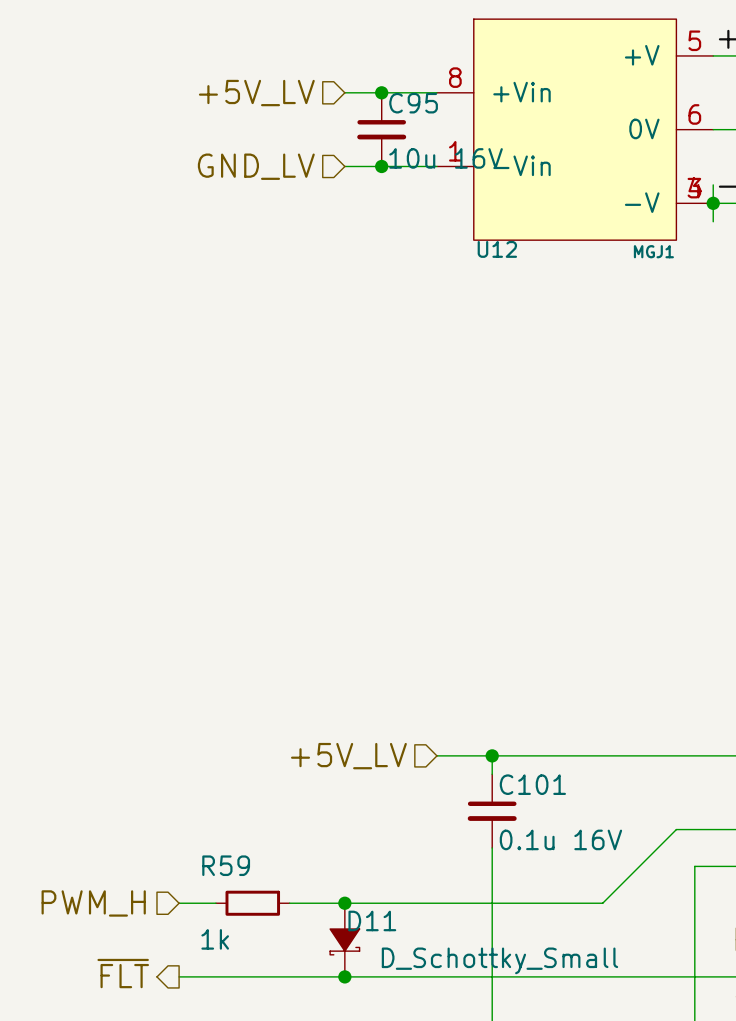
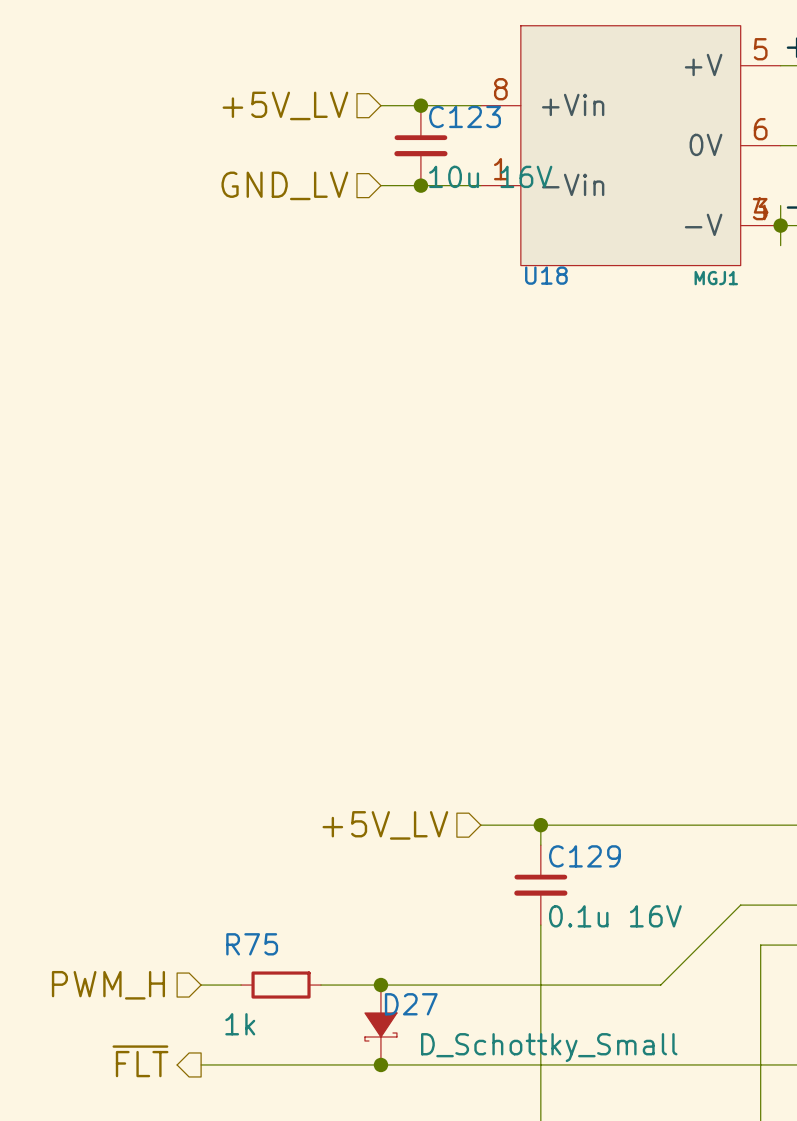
C95 name: C95 (413, 103) -> C123 (465, 116)
U12 name: U12 (497, 249) -> U18 (546, 275)
C101 name: C101 (532, 784) -> C129 (584, 856)
R59 name: R59 (226, 865) -> R75 (252, 944)
D11 name: D11 (372, 920) -> D27 (411, 1004)

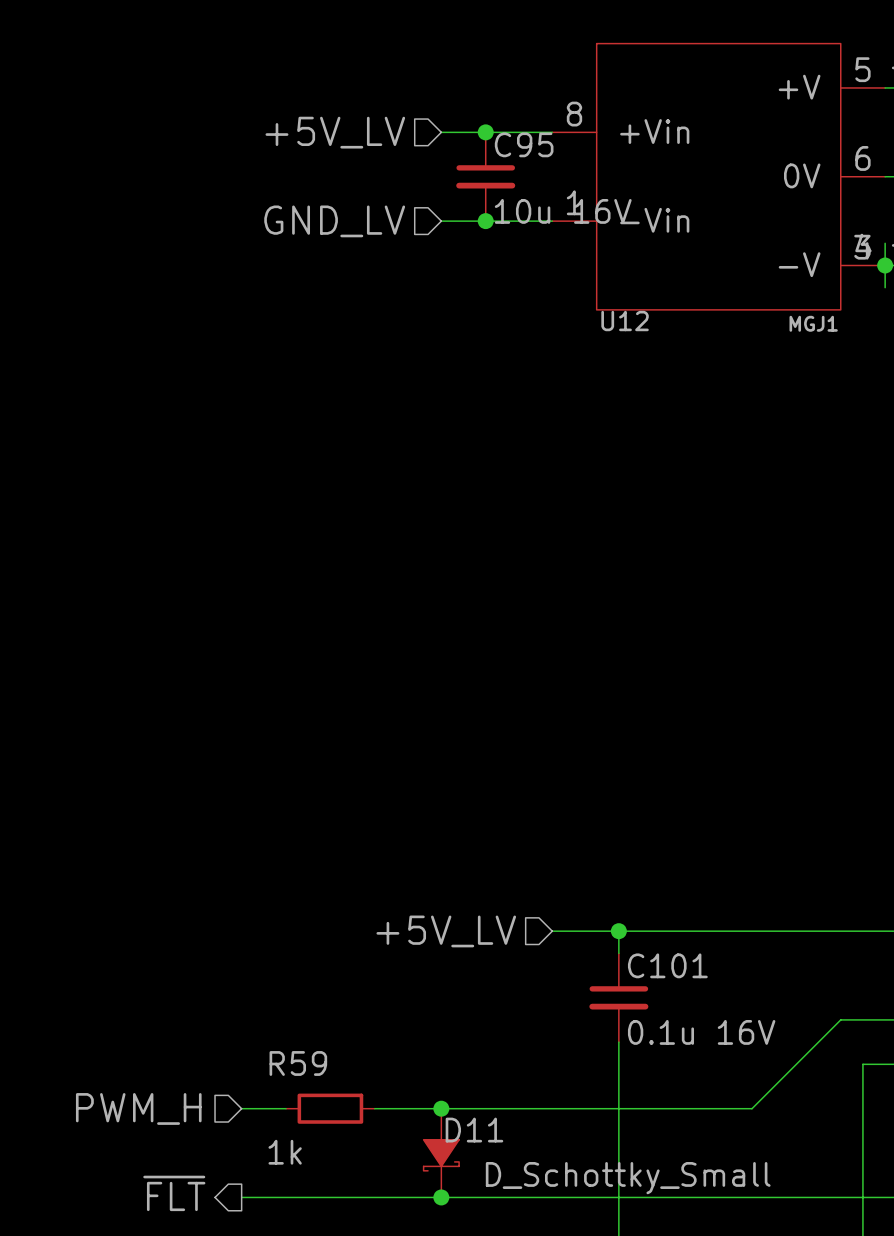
C123 name: C123 (465, 116) -> C95 (524, 144)
U18 name: U18 (546, 275) -> U12 (625, 321)
C129 name: C129 (584, 856) -> C101 (667, 965)
R75 name: R75 (252, 944) -> R59 (298, 1063)
D27 name: D27 (411, 1004) -> D11 (474, 1130)

